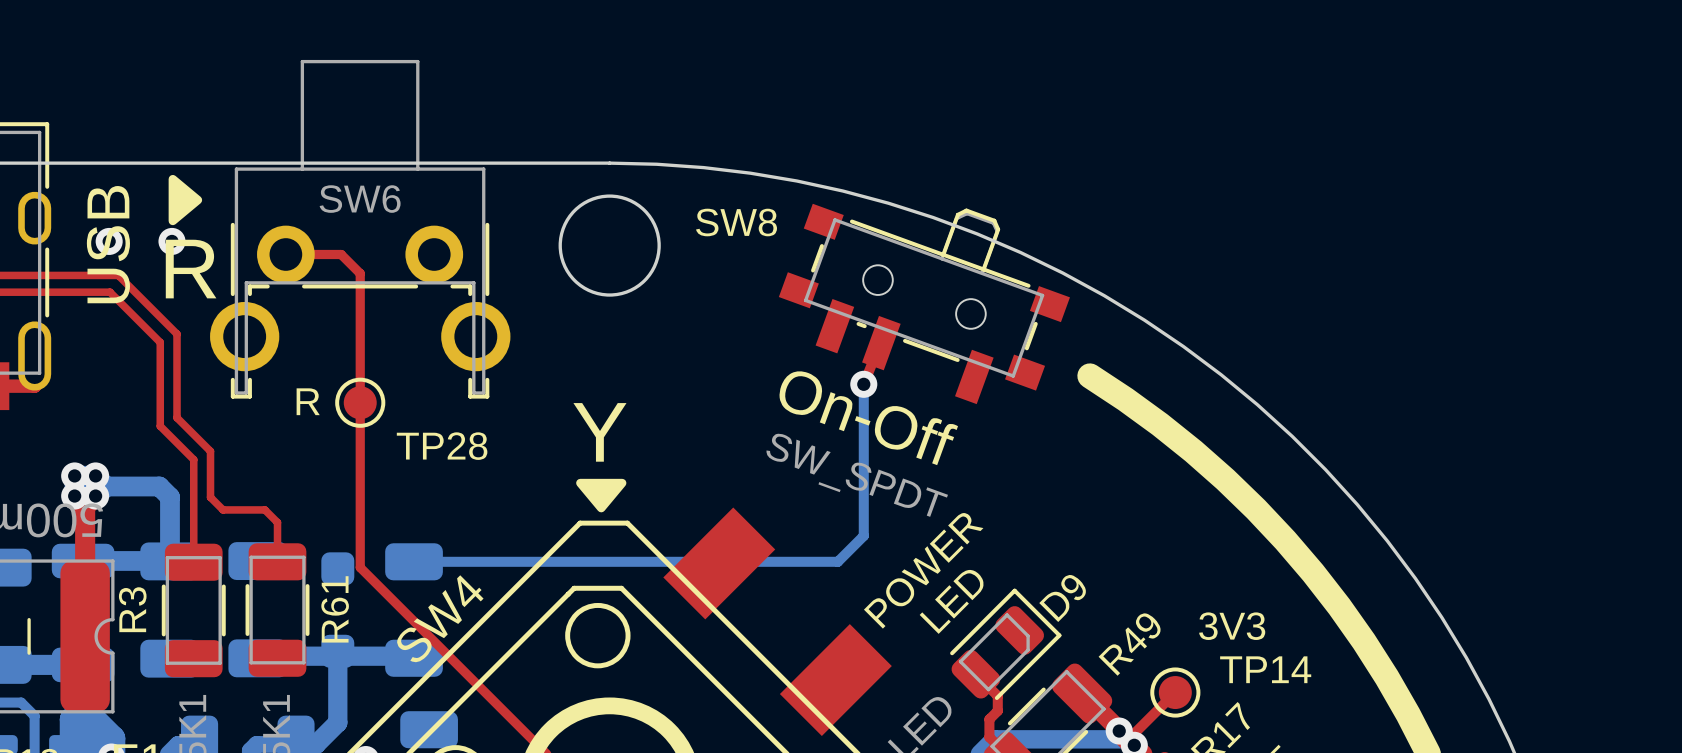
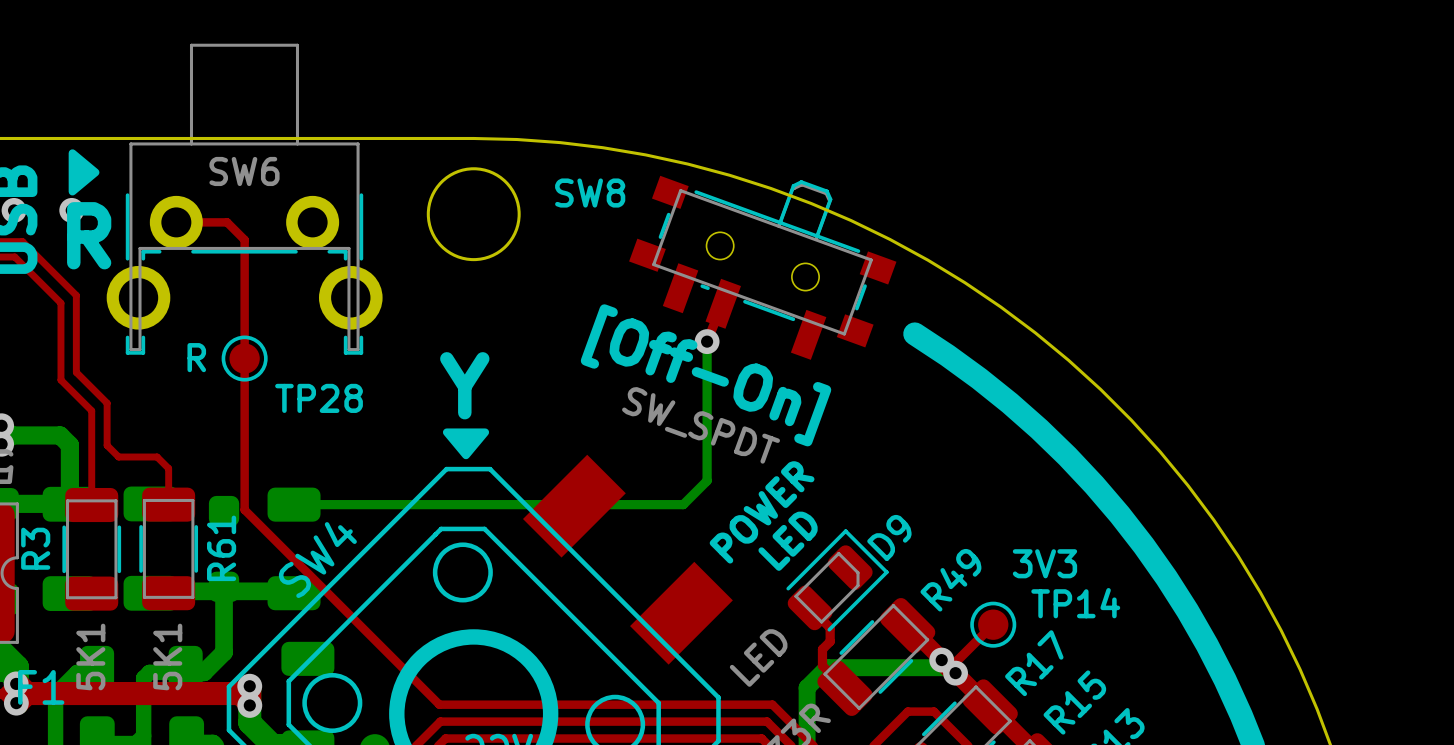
text: On-Off (868, 417) -> [Off-On] (706, 375)

